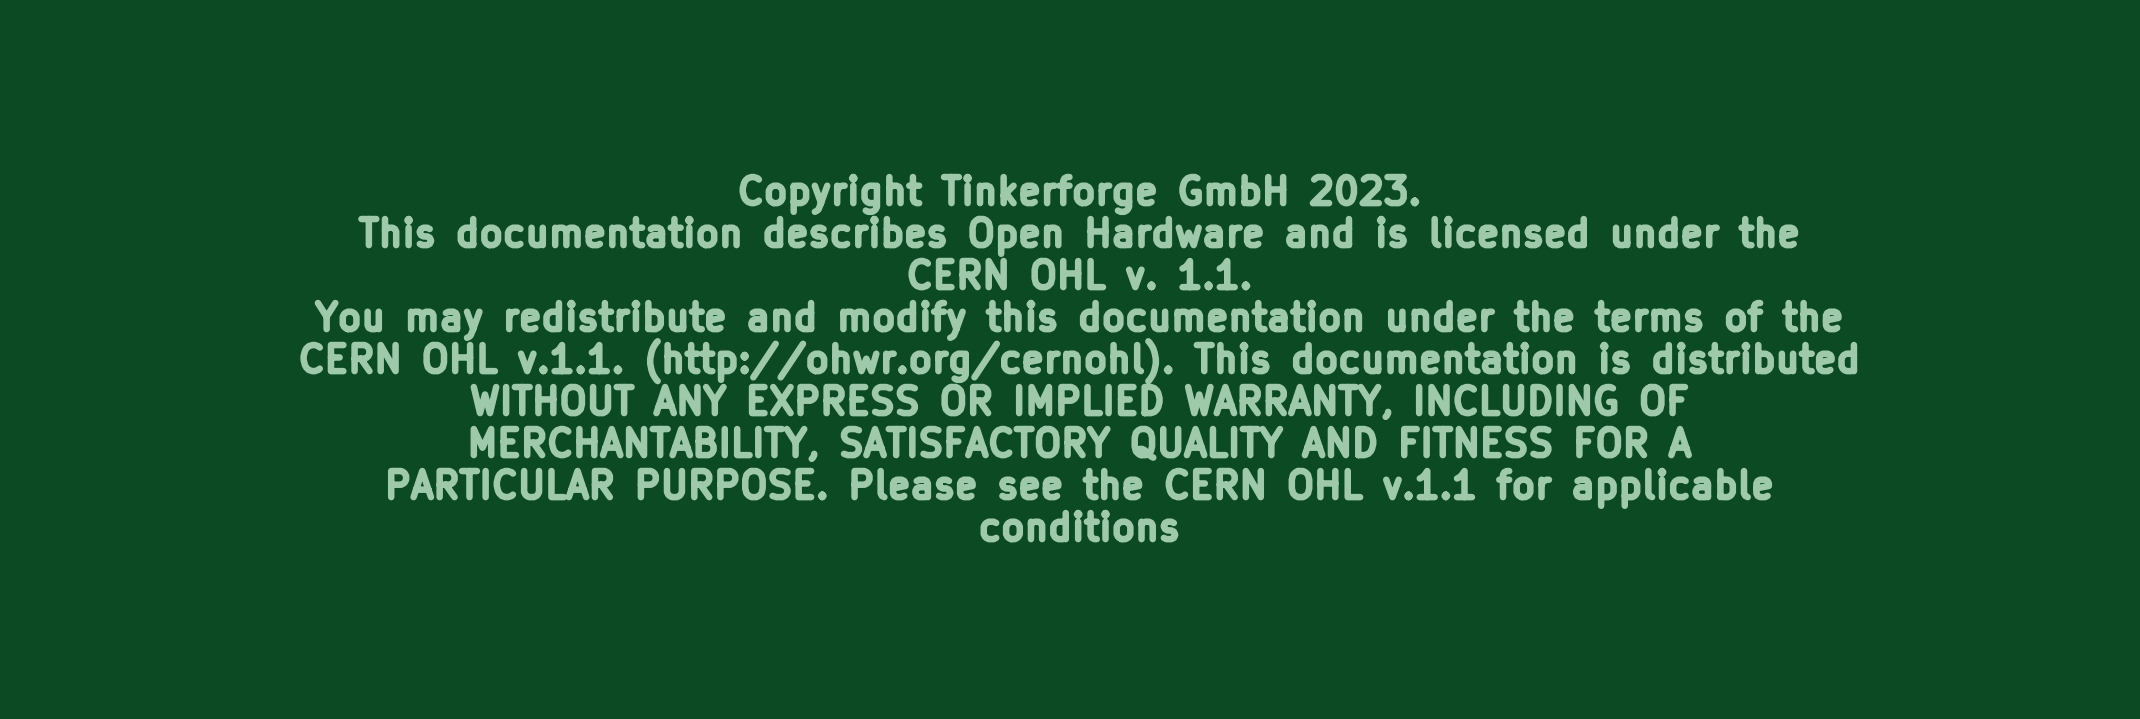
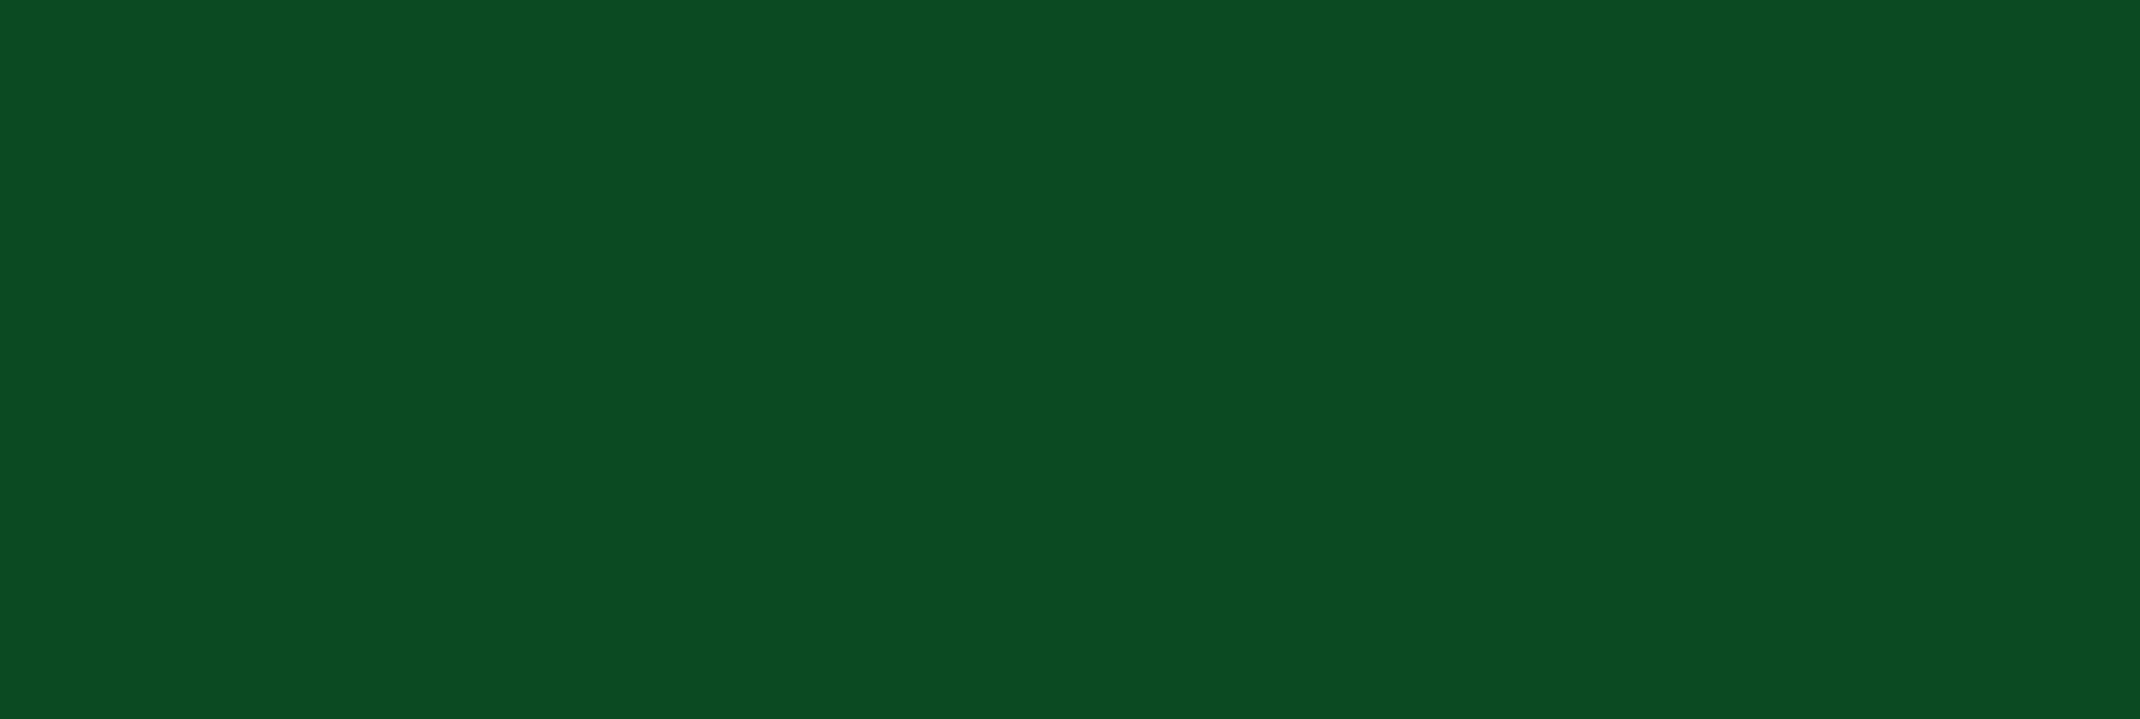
text: Copyright Tinkerforge GmbH 2023. (1079, 194) -> none
text: This documentation describes Open Hardware and is licensed under the (1078, 236) -> none
text: CERN OHL v. 1.1. (1079, 274) -> none
text: You may redistribute and modify this documentation under the terms of the (1078, 320) -> none
text: CERN OHL v.1.1. (http://ohwr.org/cernohl). This documentation is distributed (1078, 361) -> none
text: WITHOUT ANY EXPRESS OR IMPLIED WARRANTY, INCLUDING OF (1079, 401) -> none
text: MERCHANTABILITY, SATISFACTORY QUALITY AND FITNESS FOR A (1081, 443) -> none
text: PARTICULAR PURPOSE. Please see the CERN OHL v.1.1 for applicable (1080, 488) -> none
text: conditions (1079, 526) -> none

